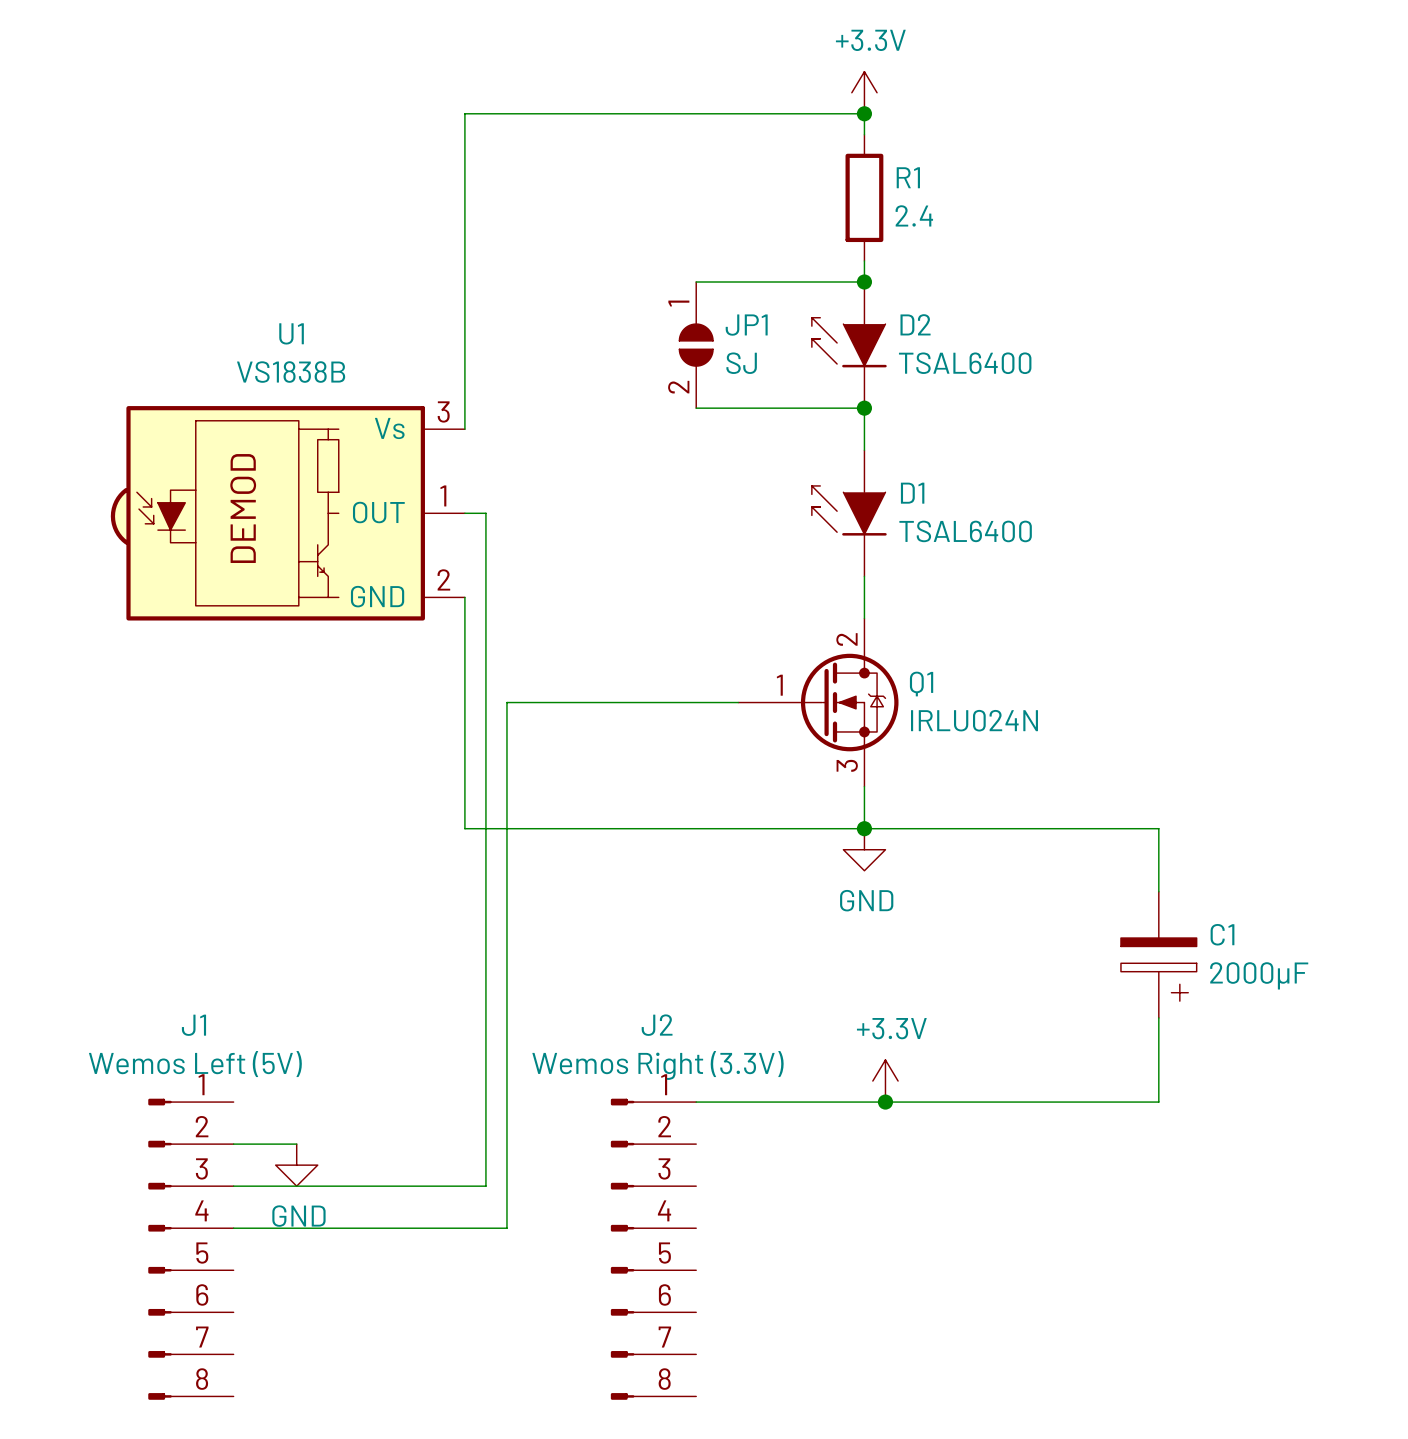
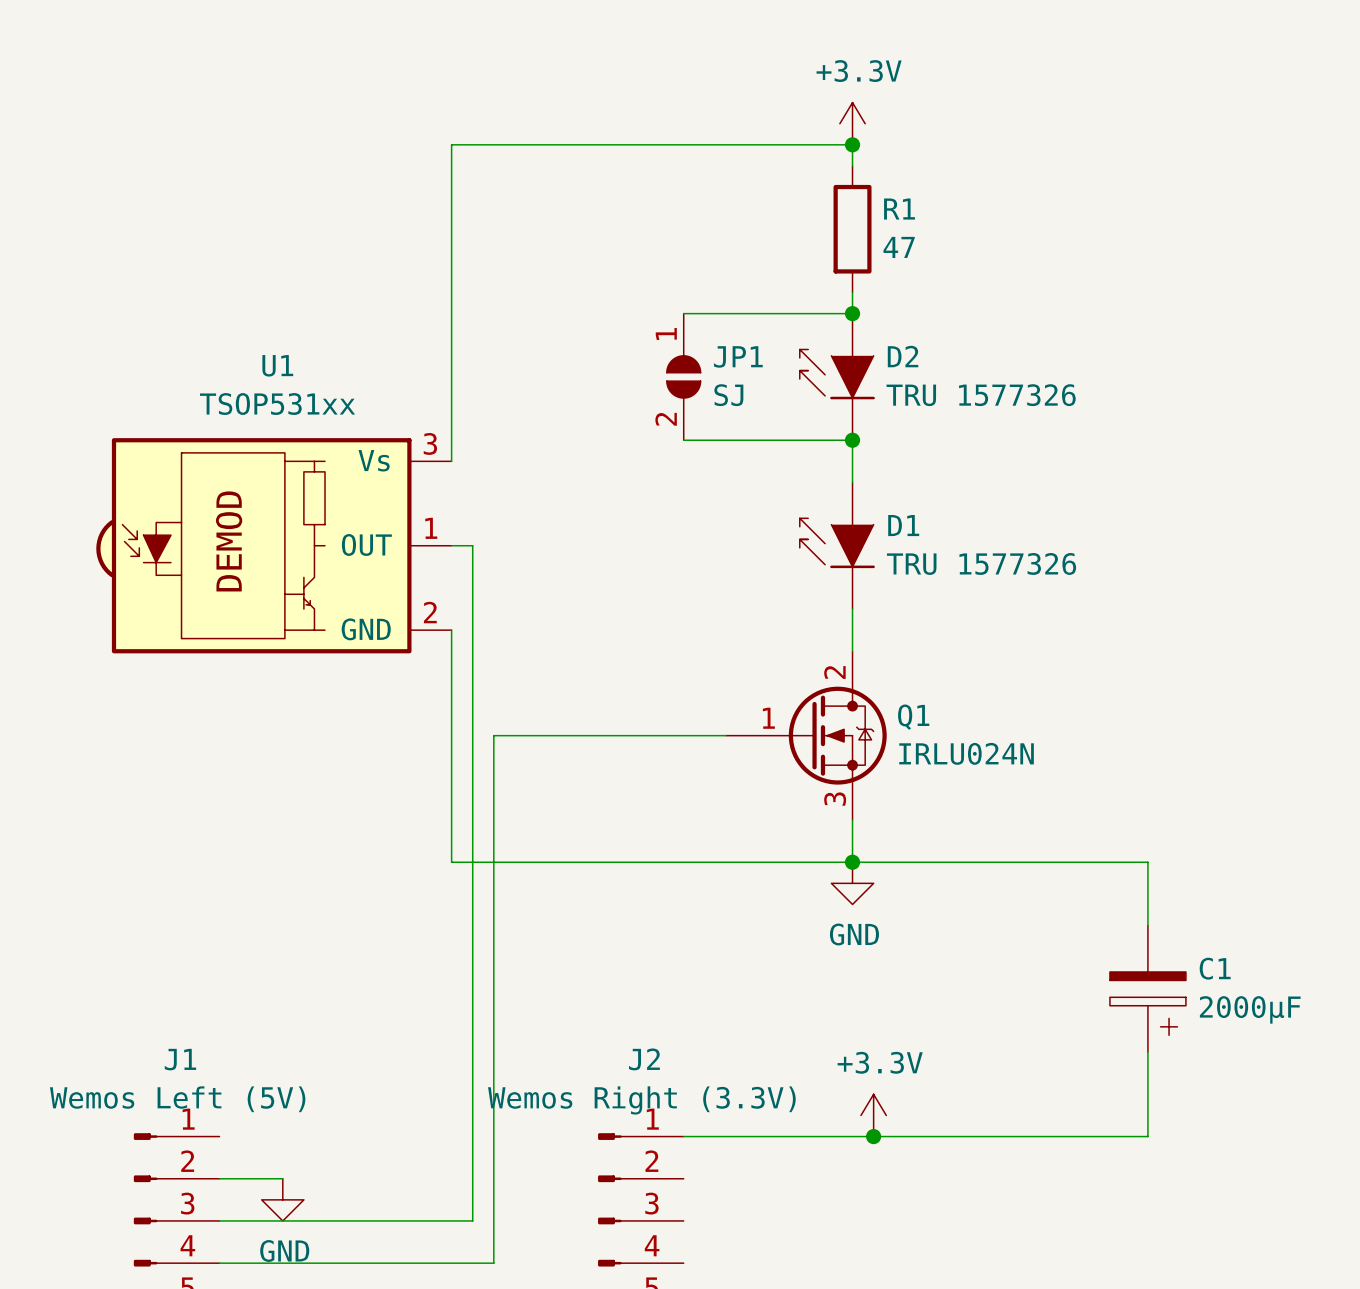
R1 value: 2.4 (914, 215) -> 47 (899, 247)
D2 value: TSAL6400 (965, 363) -> TRU 1577326 (981, 395)
U1 value: VS1838B (291, 372) -> TSOP531xx (277, 404)
D1 value: TSAL6400 (965, 531) -> TRU 1577326 (981, 563)

